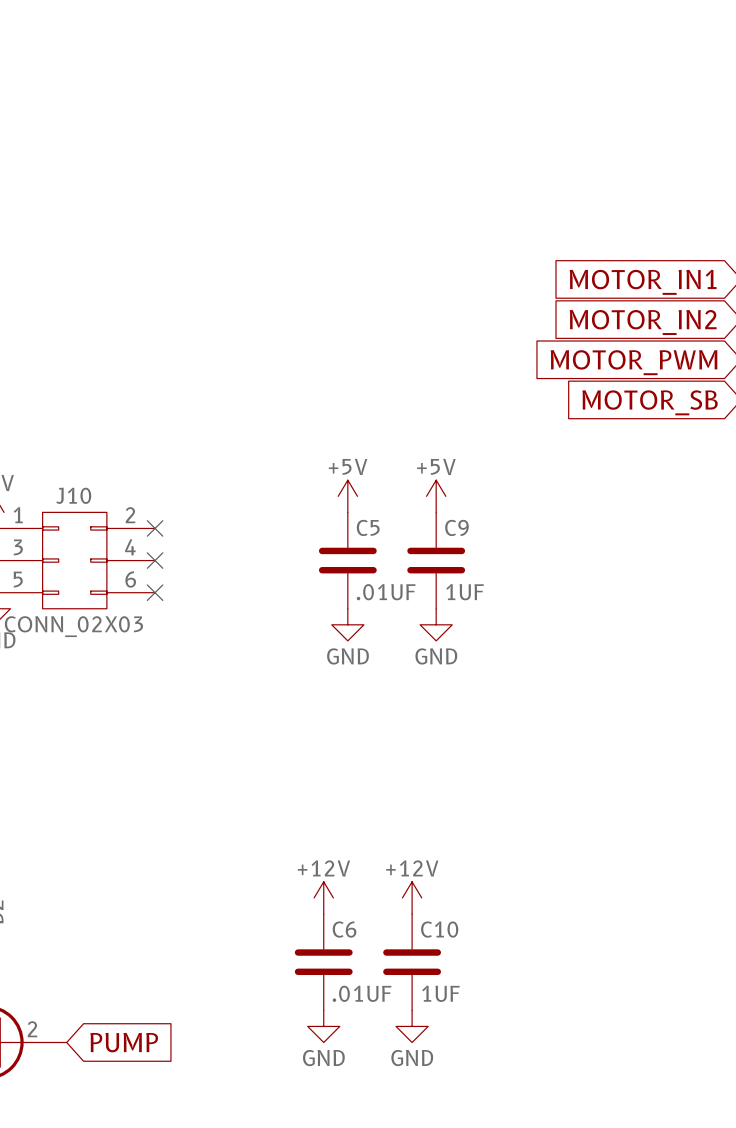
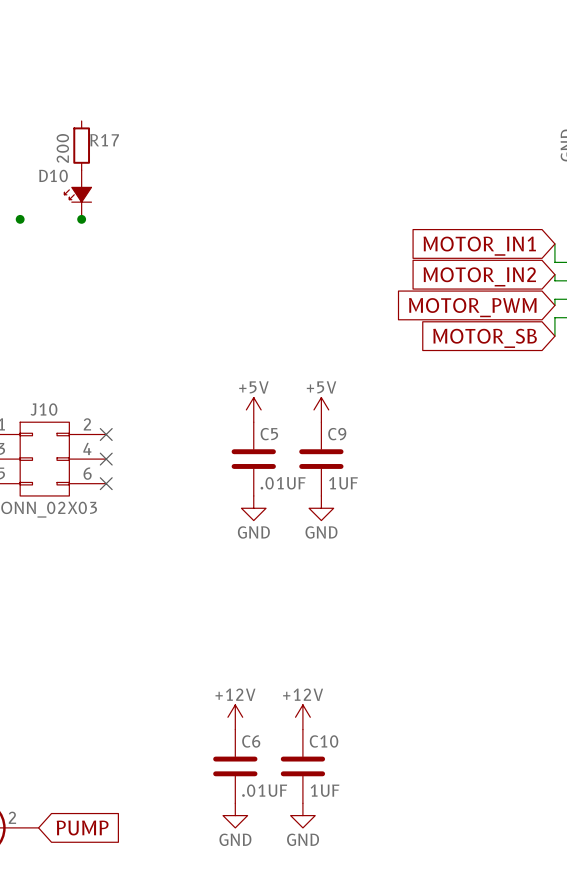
R17: none -> 200 (81, 145)
D10: none -> (77, 194)
junction: none -> (20, 219)
junction: none -> (81, 219)

